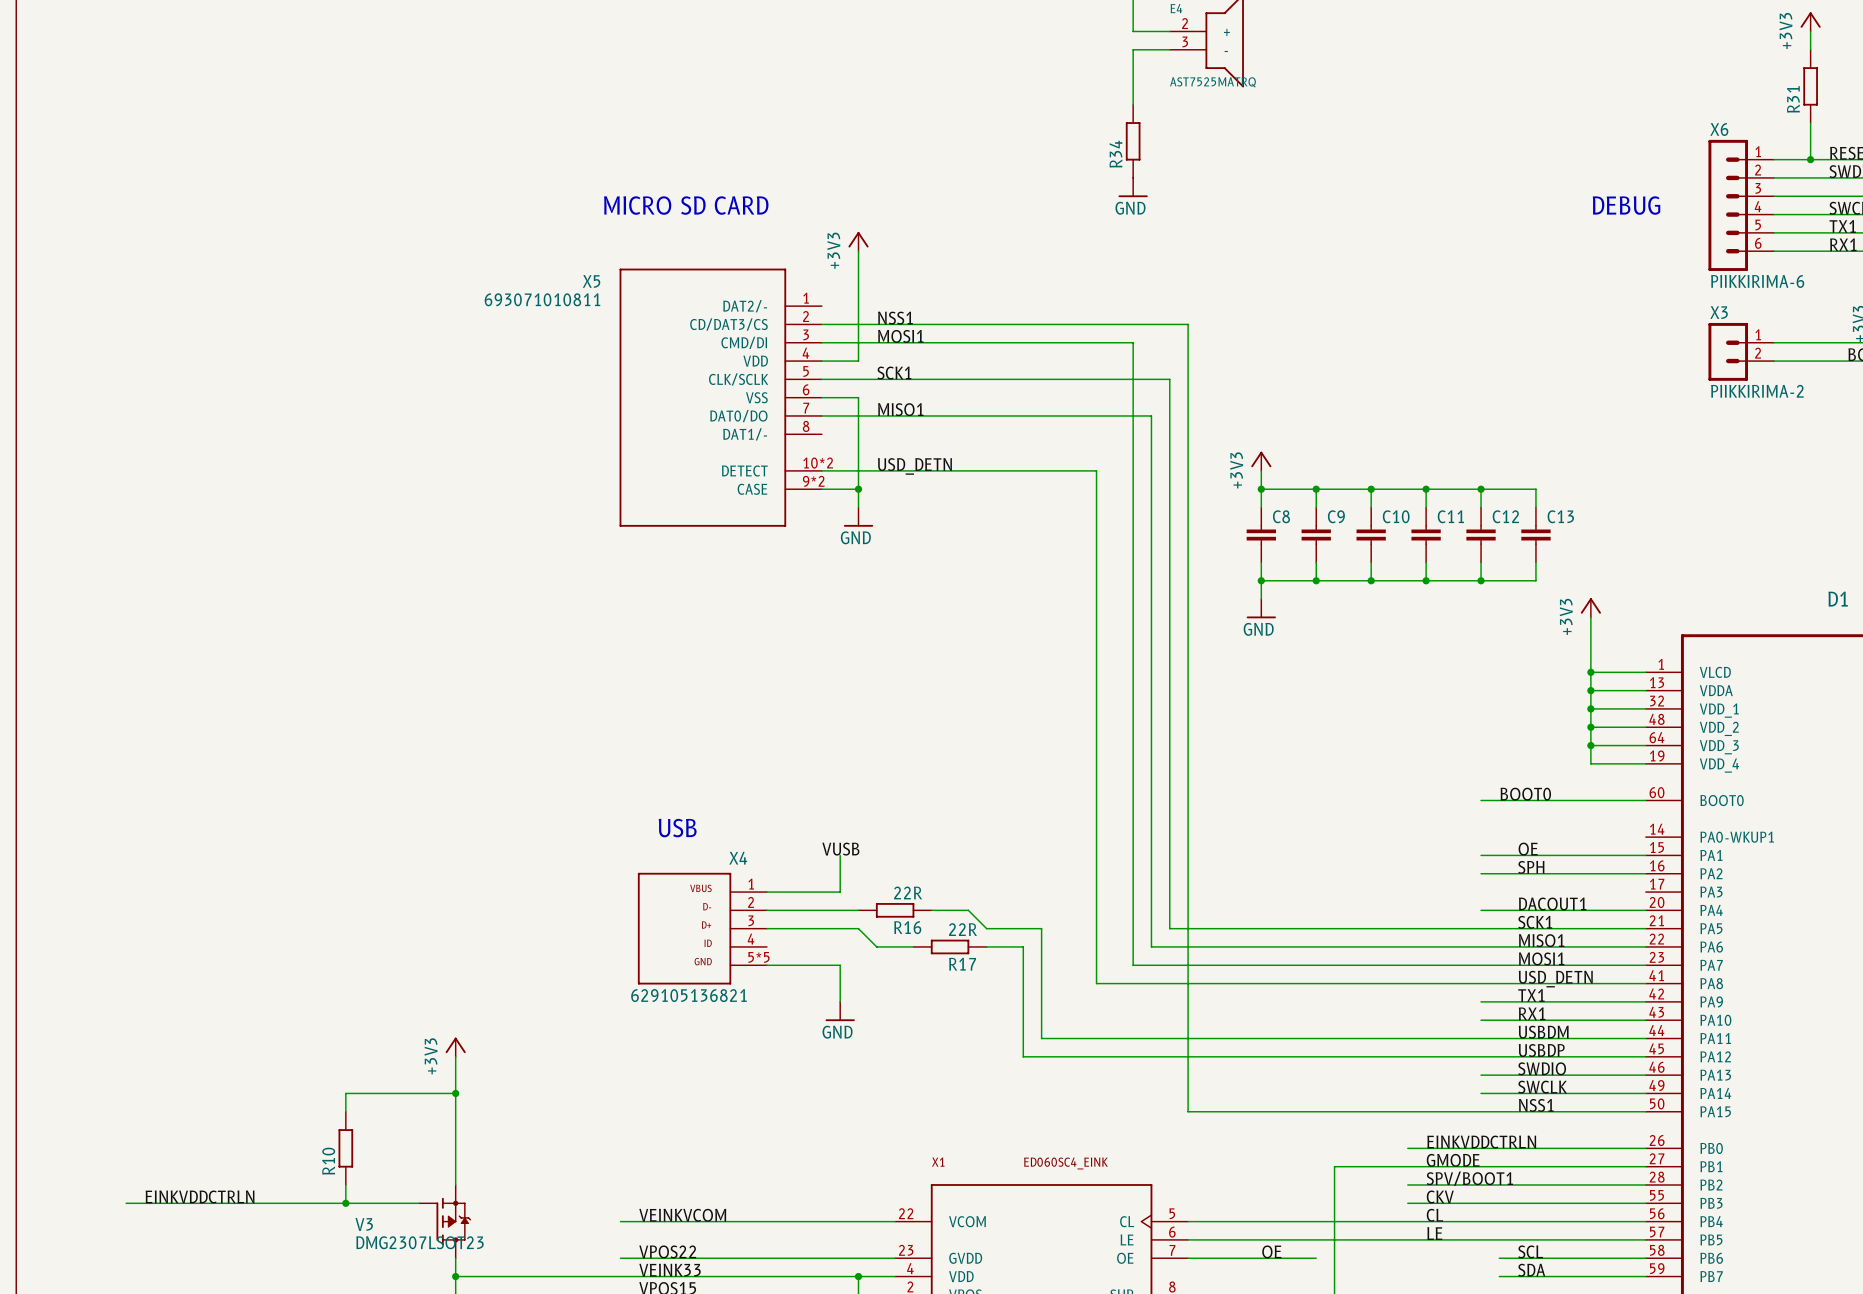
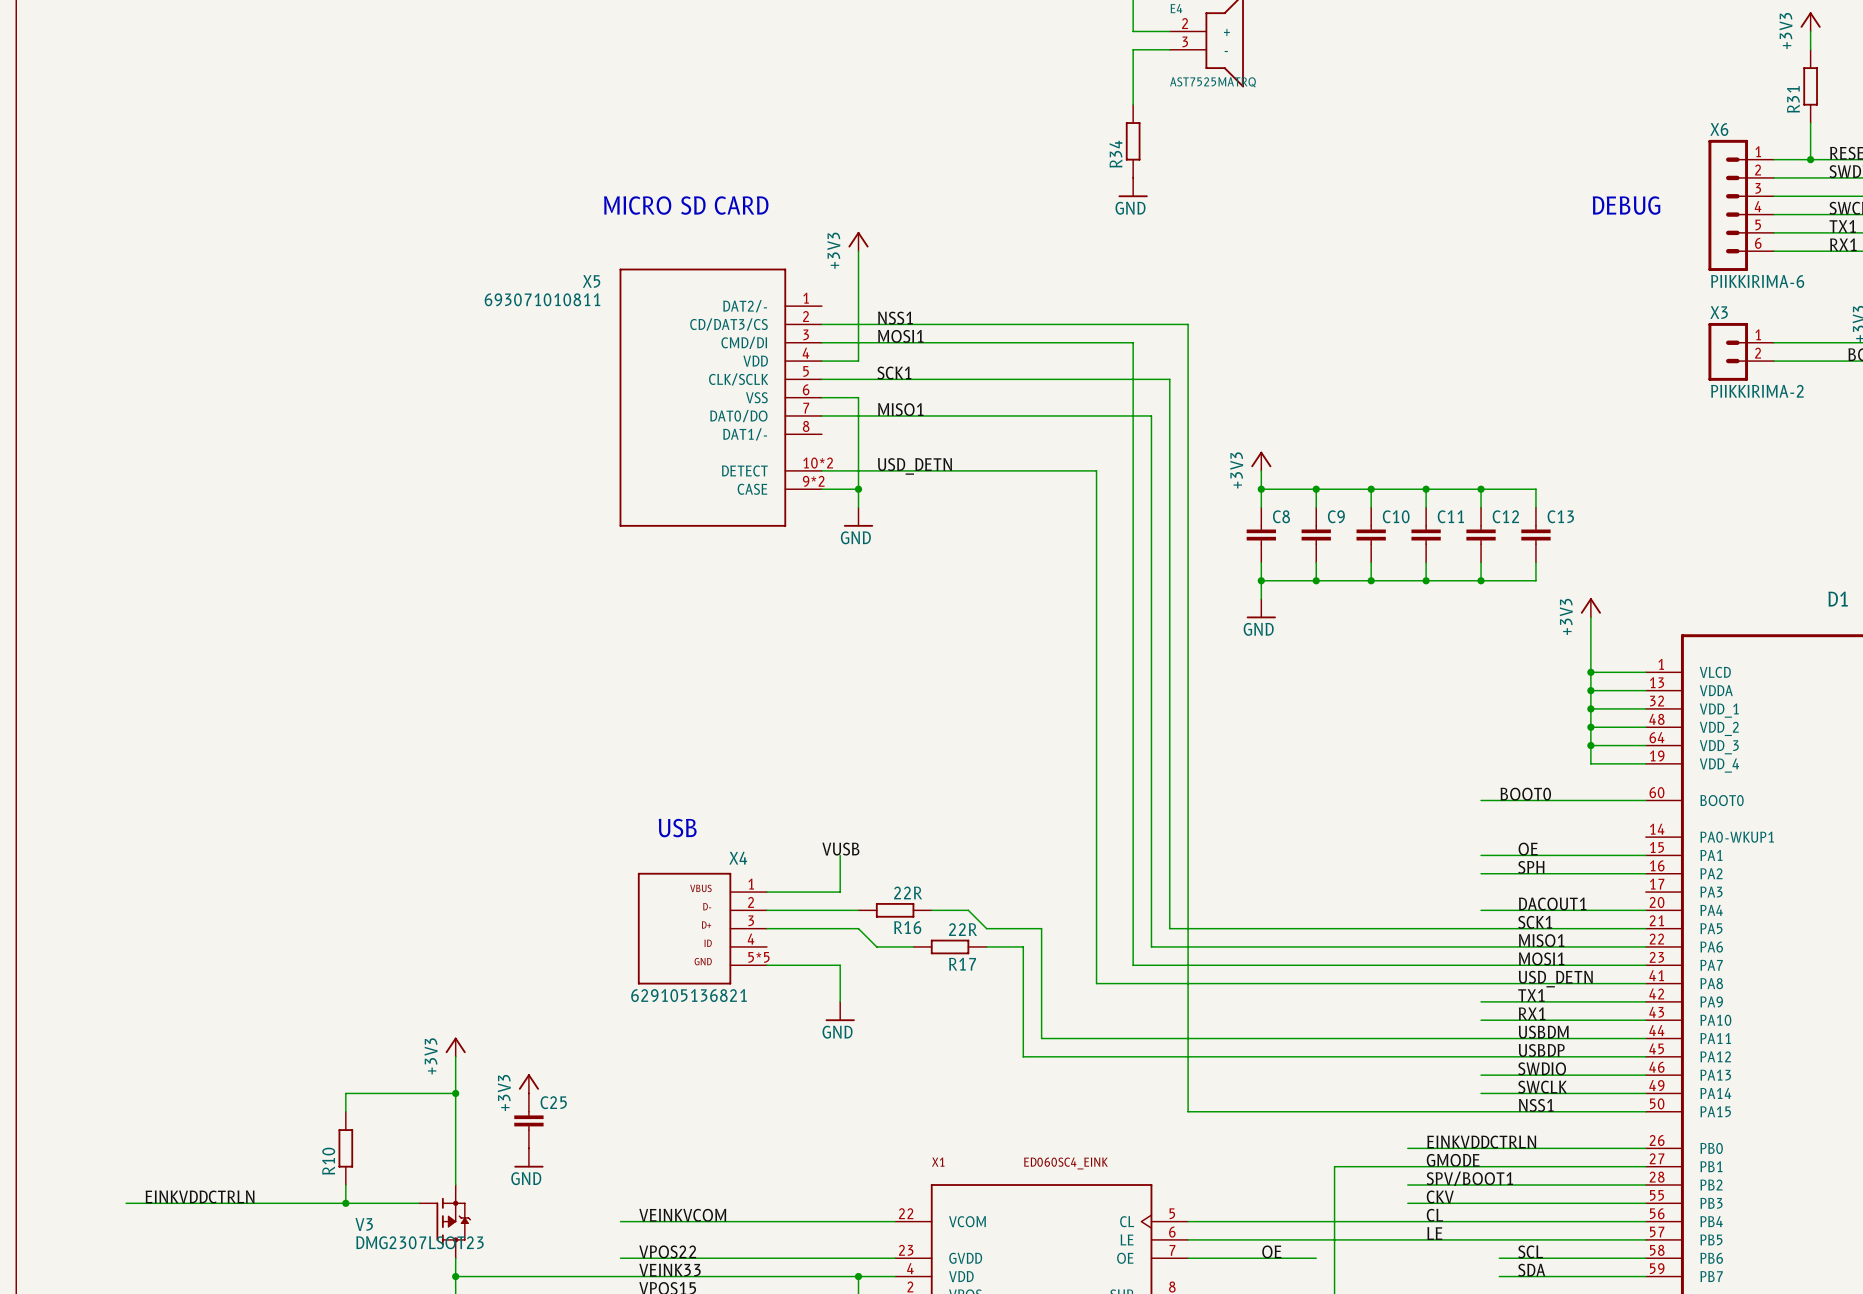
power symbol: none -> +3V3 (528, 1083)
C25: none -> (528, 1120)
power symbol: none -> GND (528, 1157)

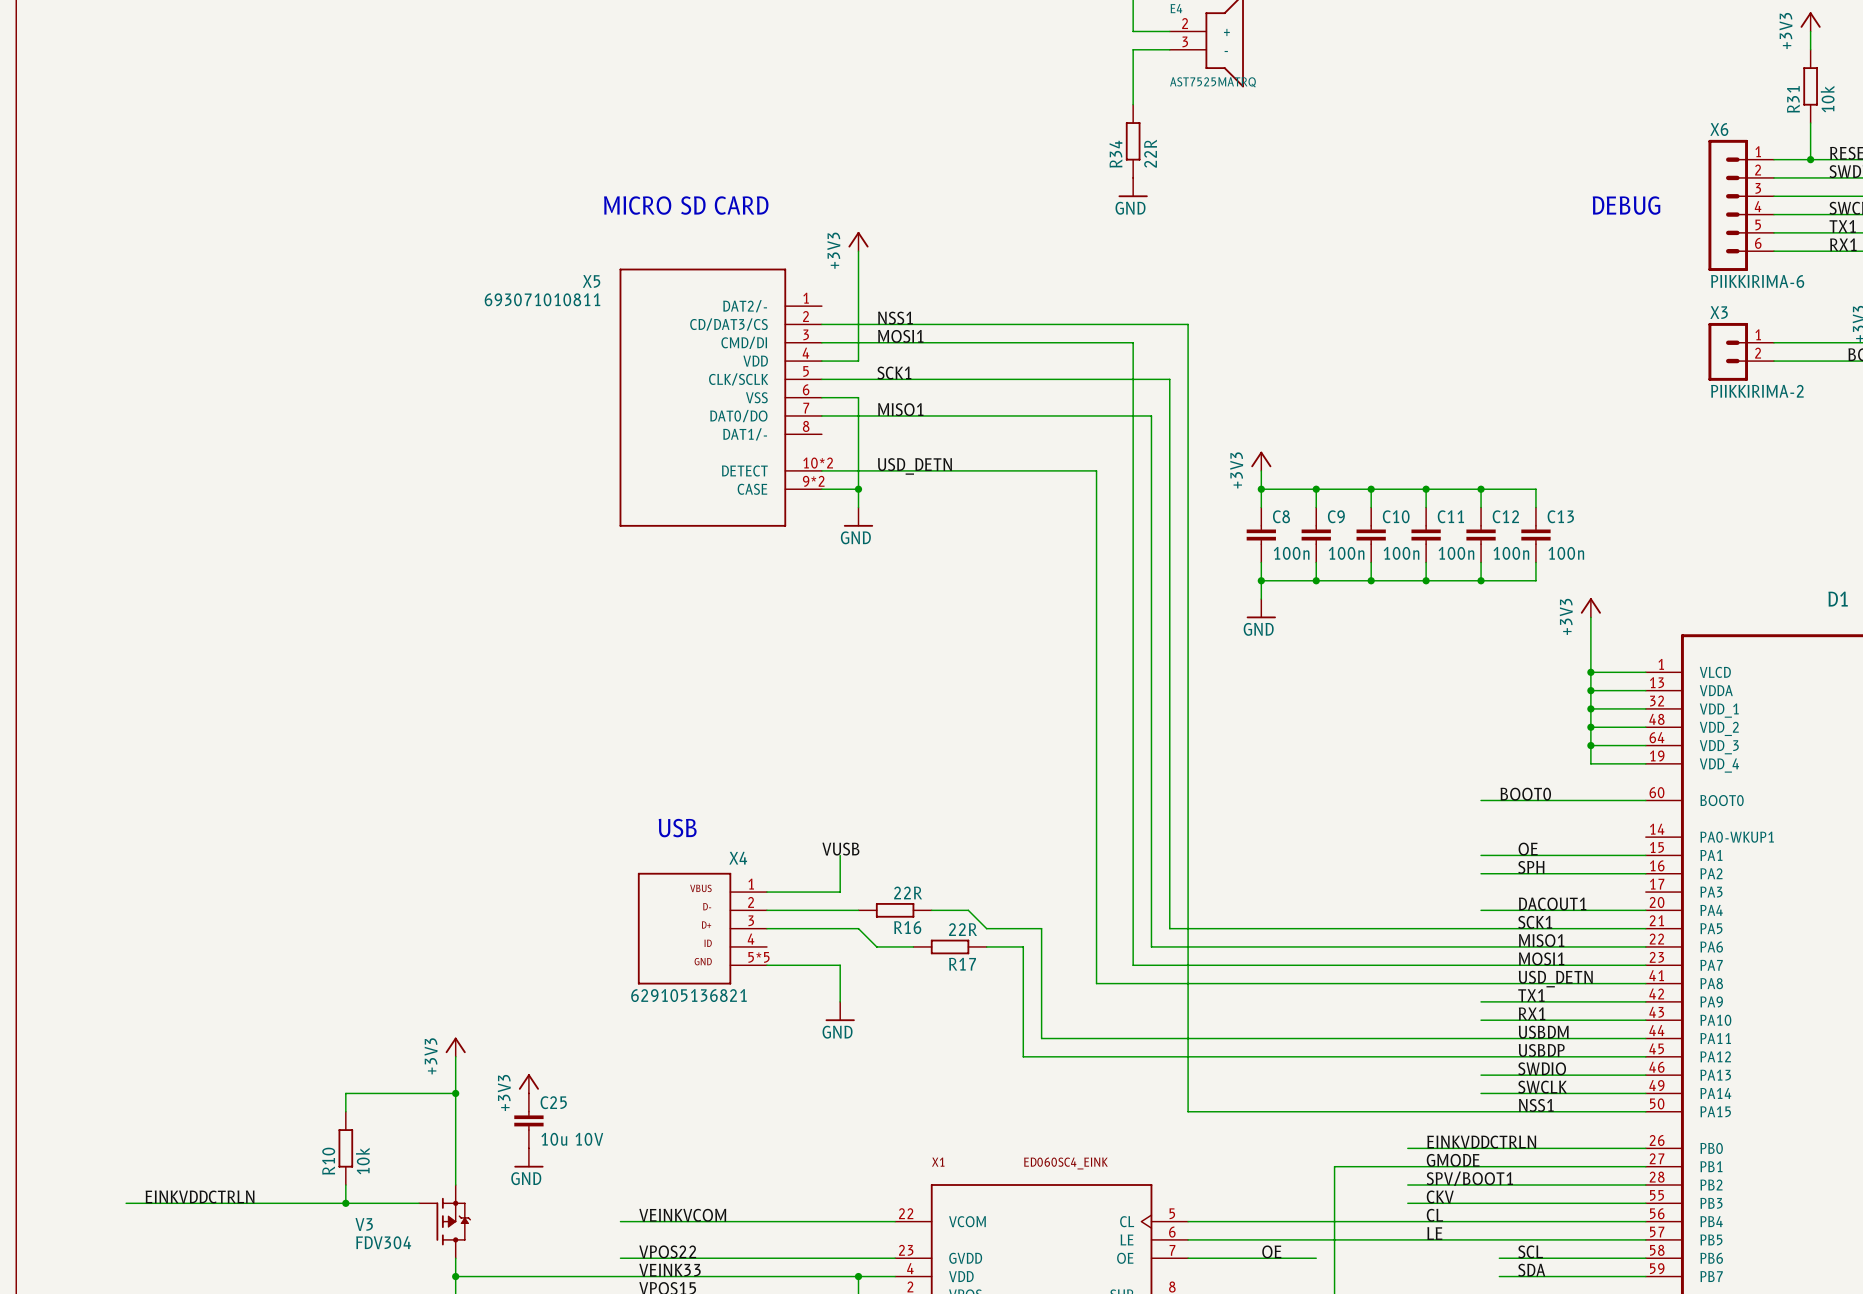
R31 value: none -> 10k (1827, 99)
R34 value: none -> 22R (1150, 153)
C8 value: none -> 100n (1291, 553)
C9 value: none -> 100n (1346, 553)
C10 value: none -> 100n (1401, 553)
C11 value: none -> 100n (1456, 553)
C12 value: none -> 100n (1511, 553)
C13 value: none -> 100n (1566, 553)
C25 value: none -> 10u 10V (572, 1139)
R10 value: none -> 10k (362, 1161)
V3 value: DMG2307LSOT23 (419, 1242) -> FDV304 (383, 1242)

